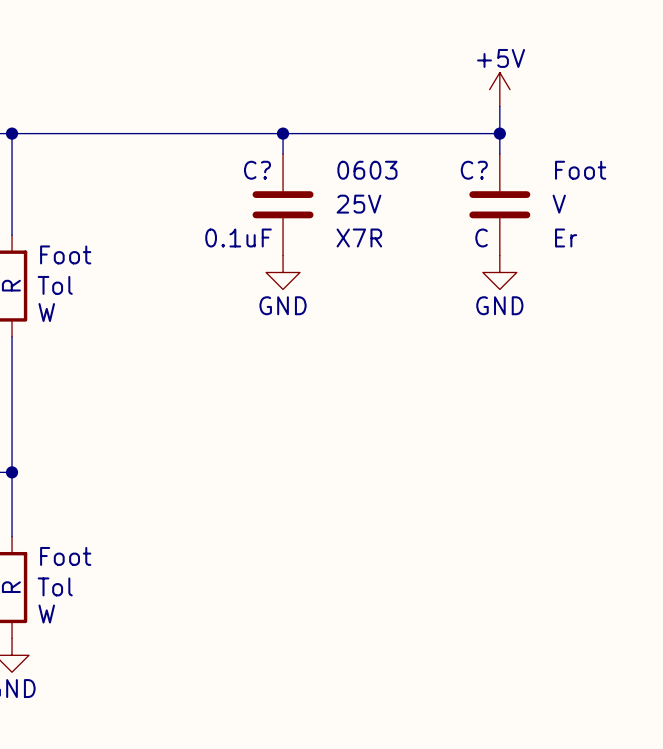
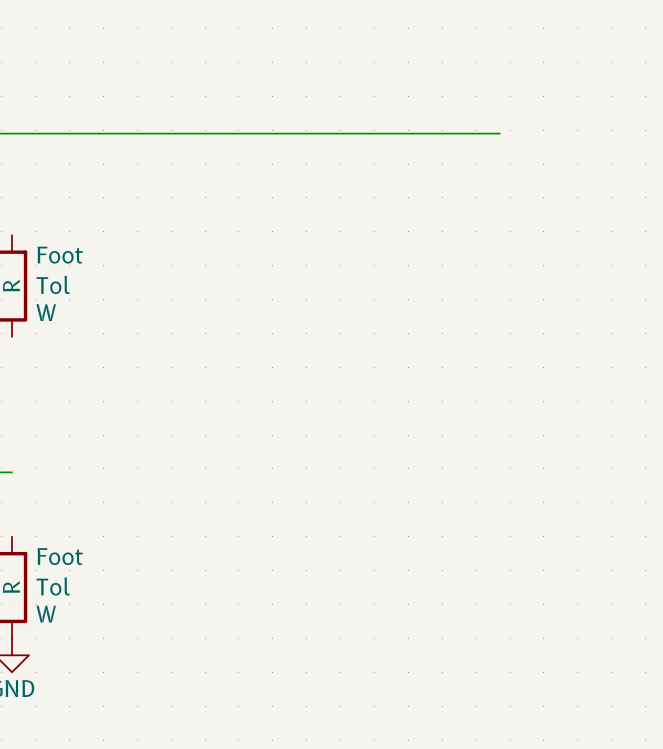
power symbol: +5V (499, 89) -> none
wire: (499, 106) (499, 153) -> none
wire: (12, 133) (12, 235) -> none
junction: (12, 133) -> none
wire: (283, 133) (283, 153) -> none
junction: (283, 133) -> none
junction: (499, 133) -> none
C?: 0.1uF (283, 204) -> none
C?: C (499, 204) -> none
power symbol: GND (283, 272) -> none
power symbol: GND (499, 272) -> none
wire: (12, 336) (12, 536) -> none
junction: (12, 472) -> none

